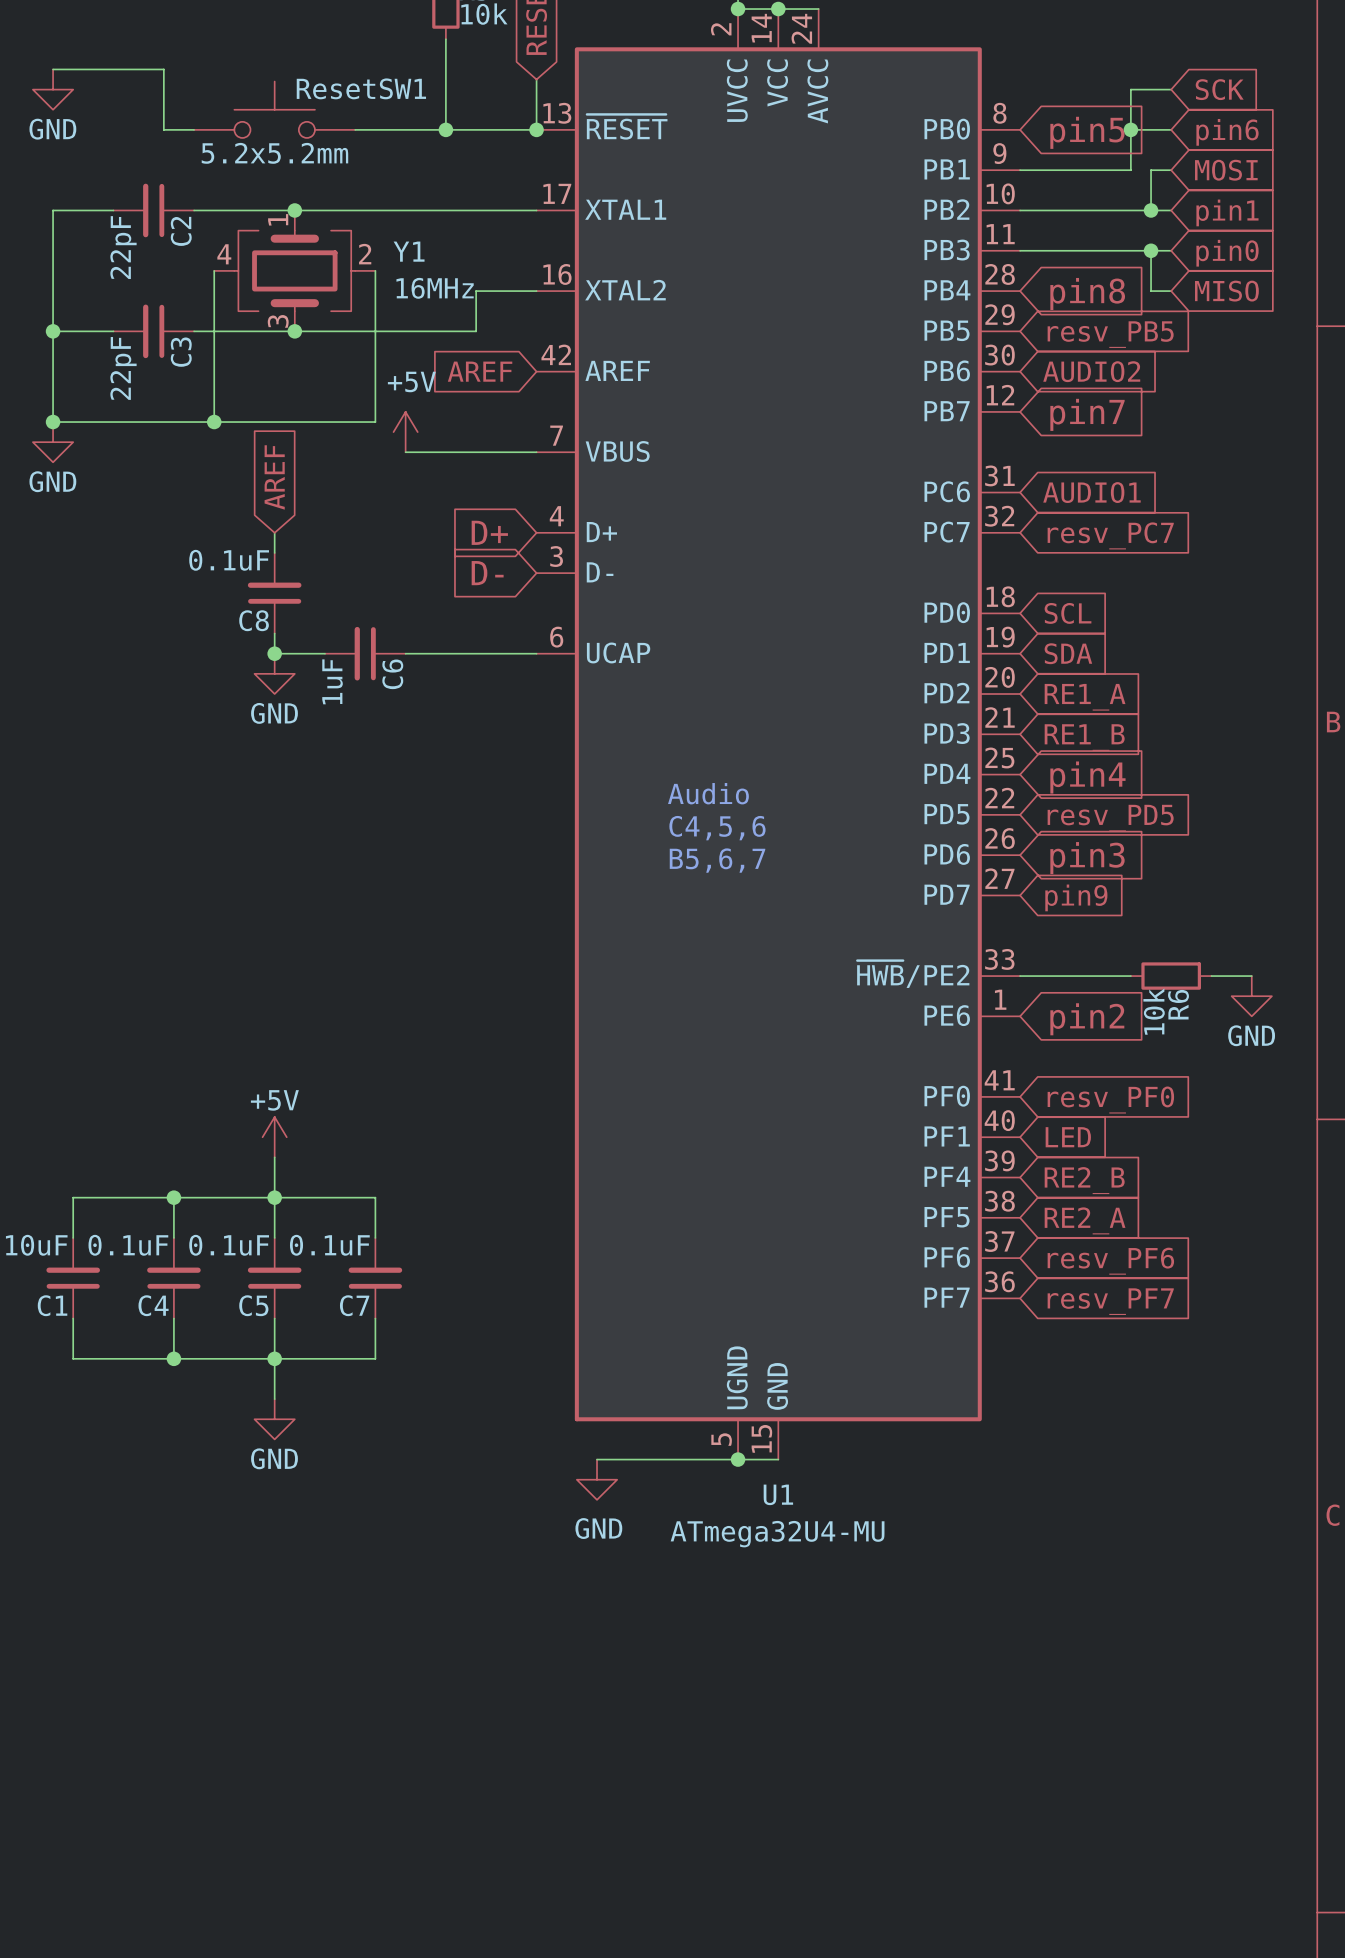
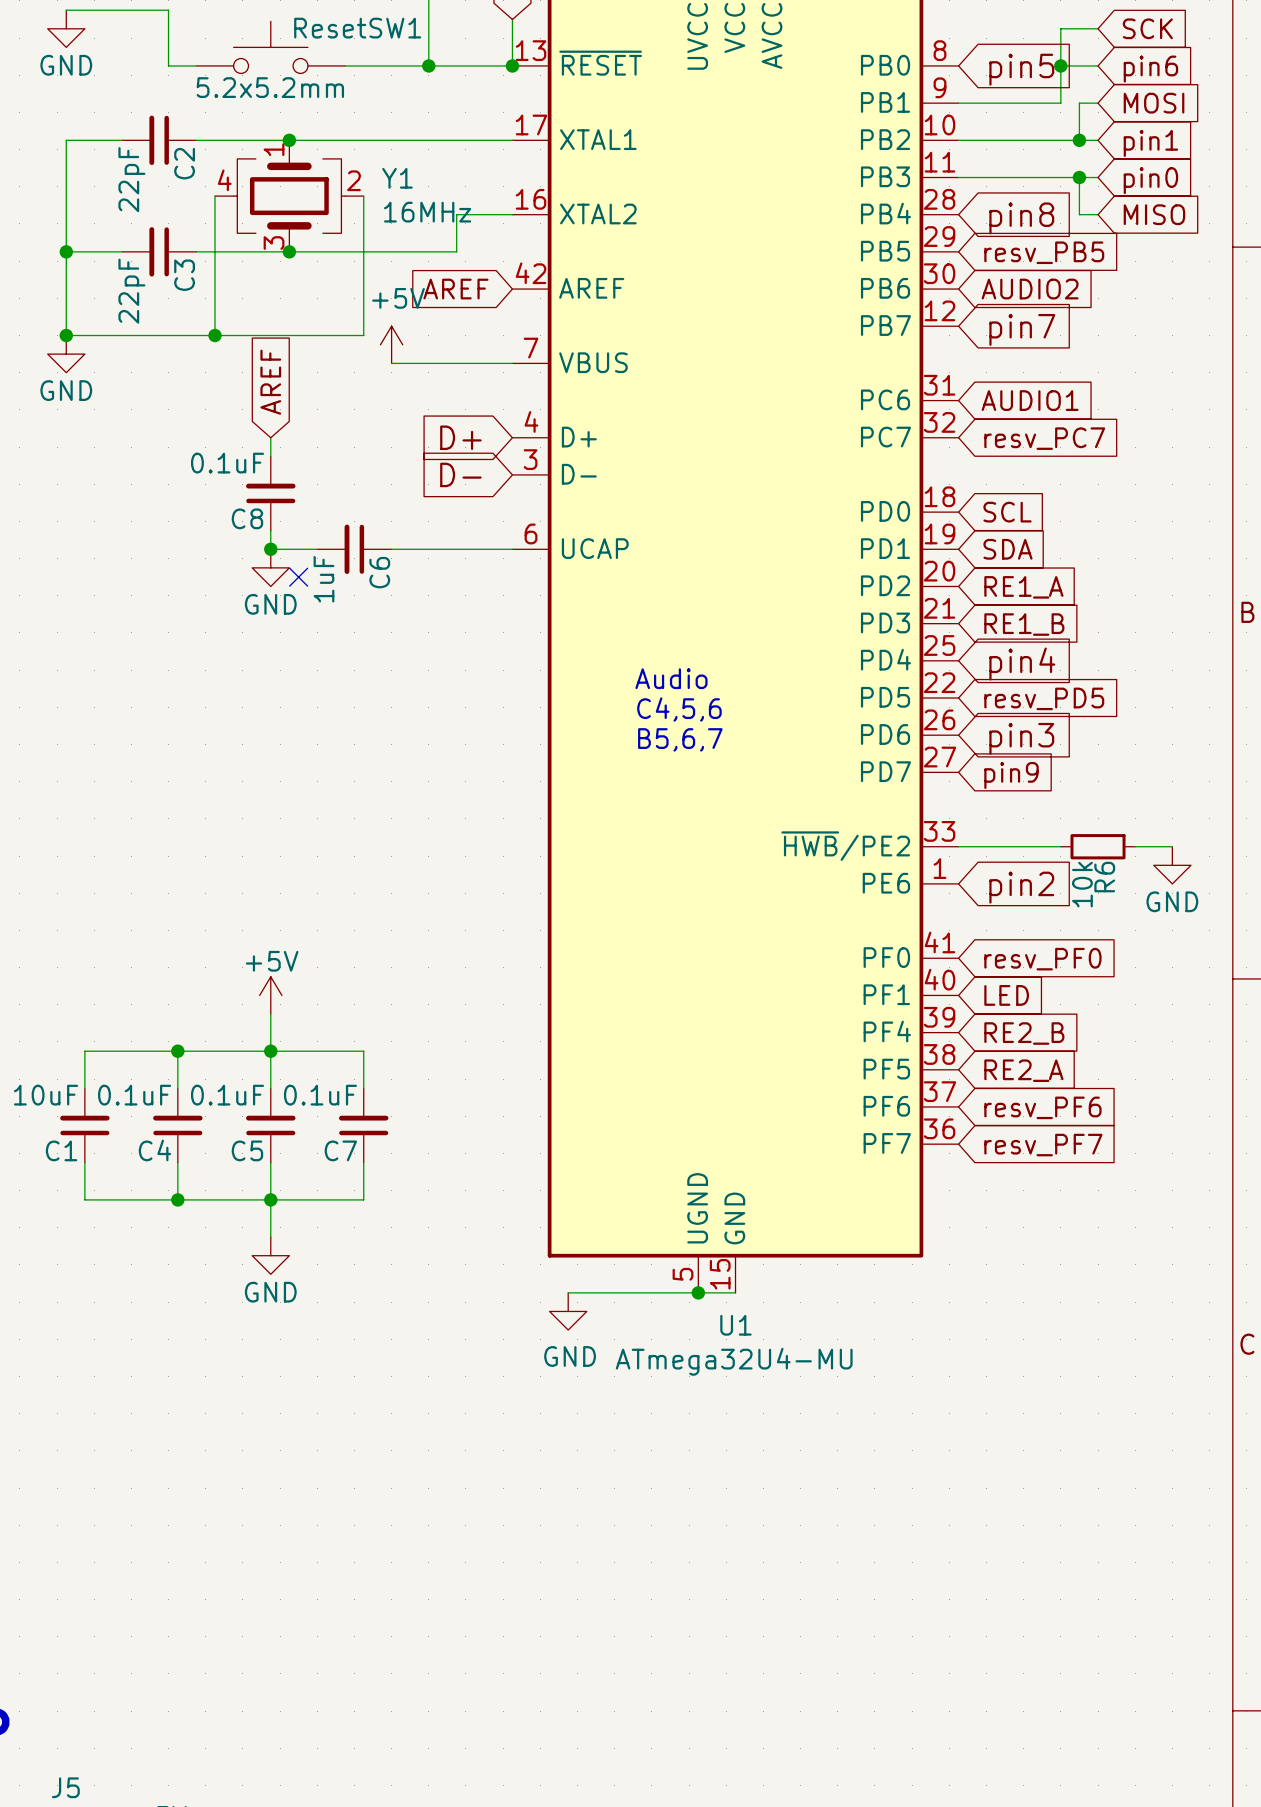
no-connect mark: none -> (298, 577)

